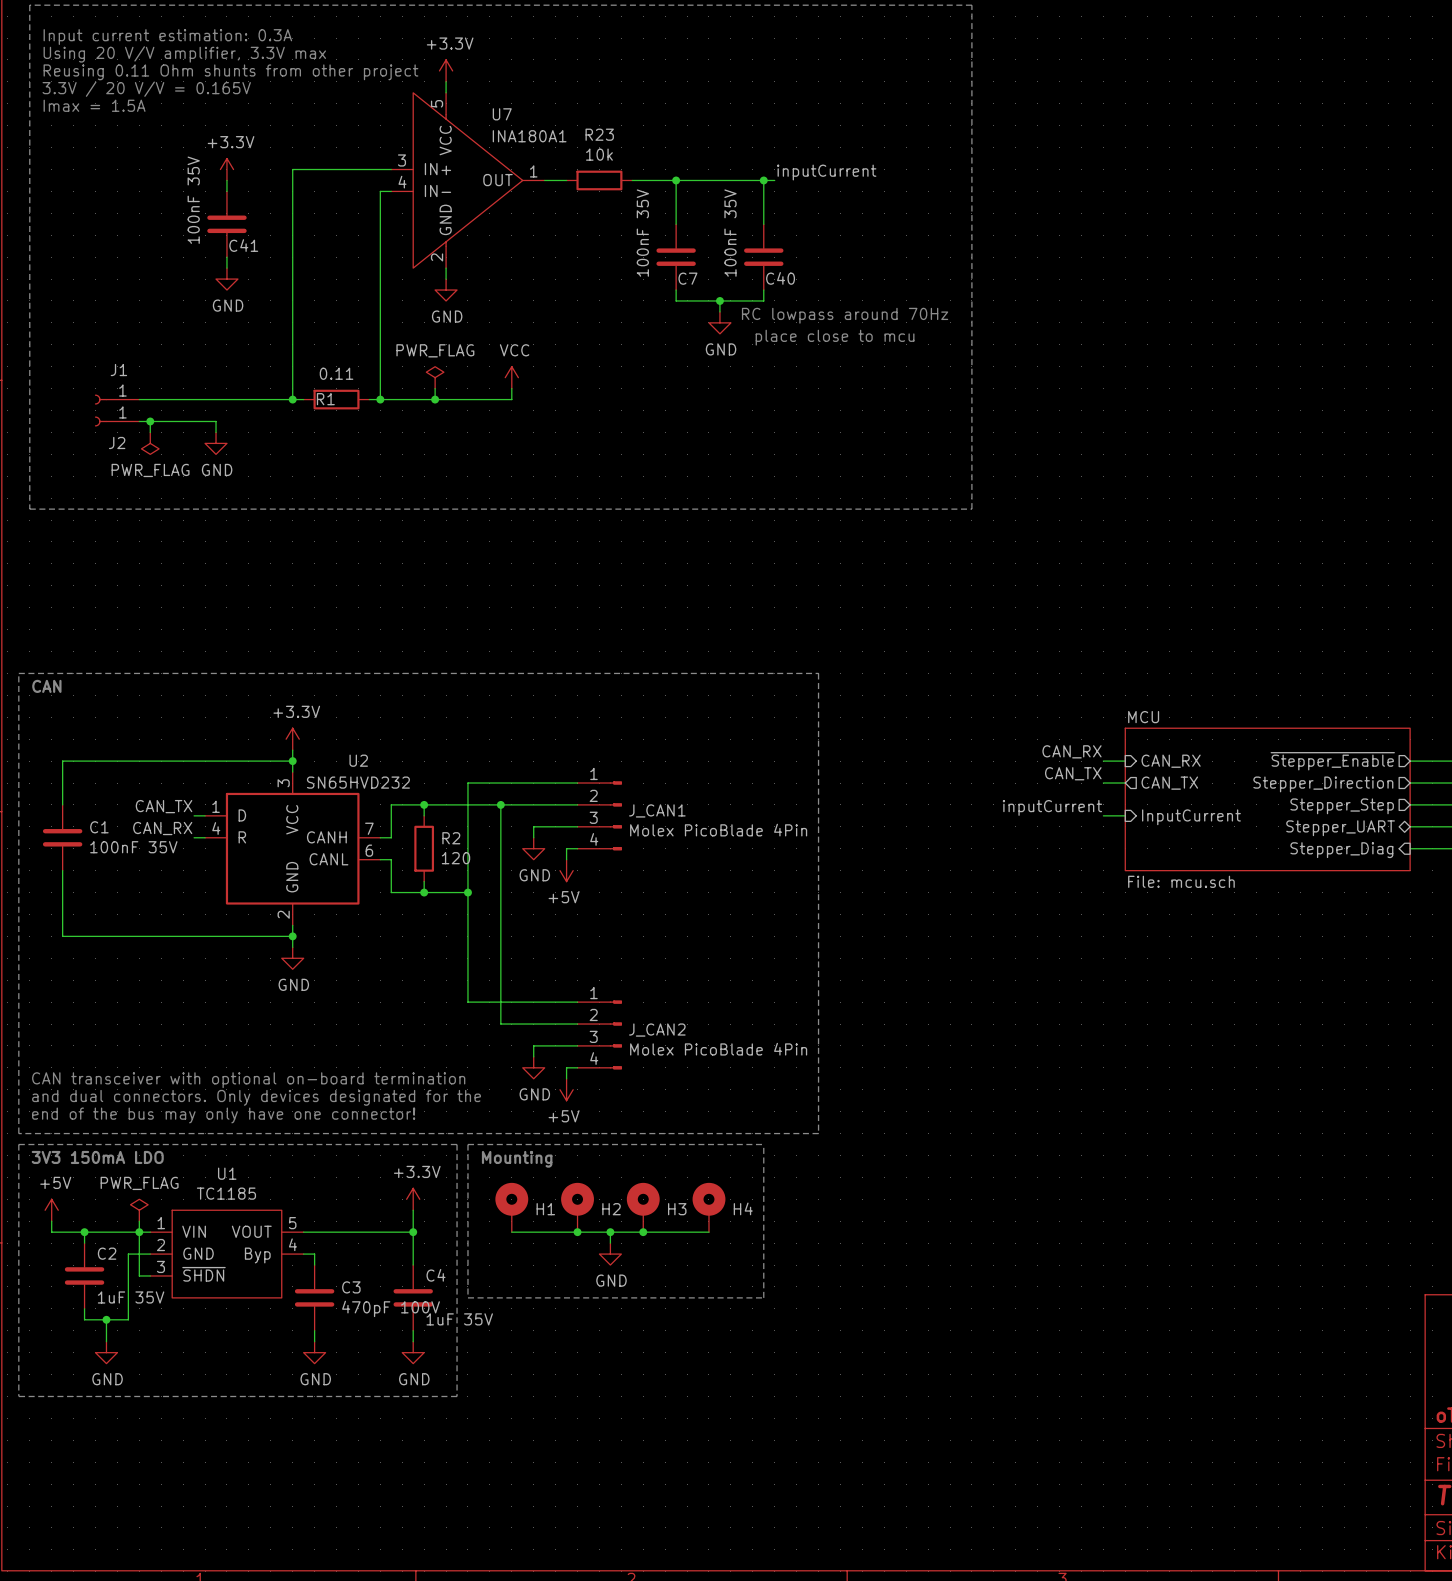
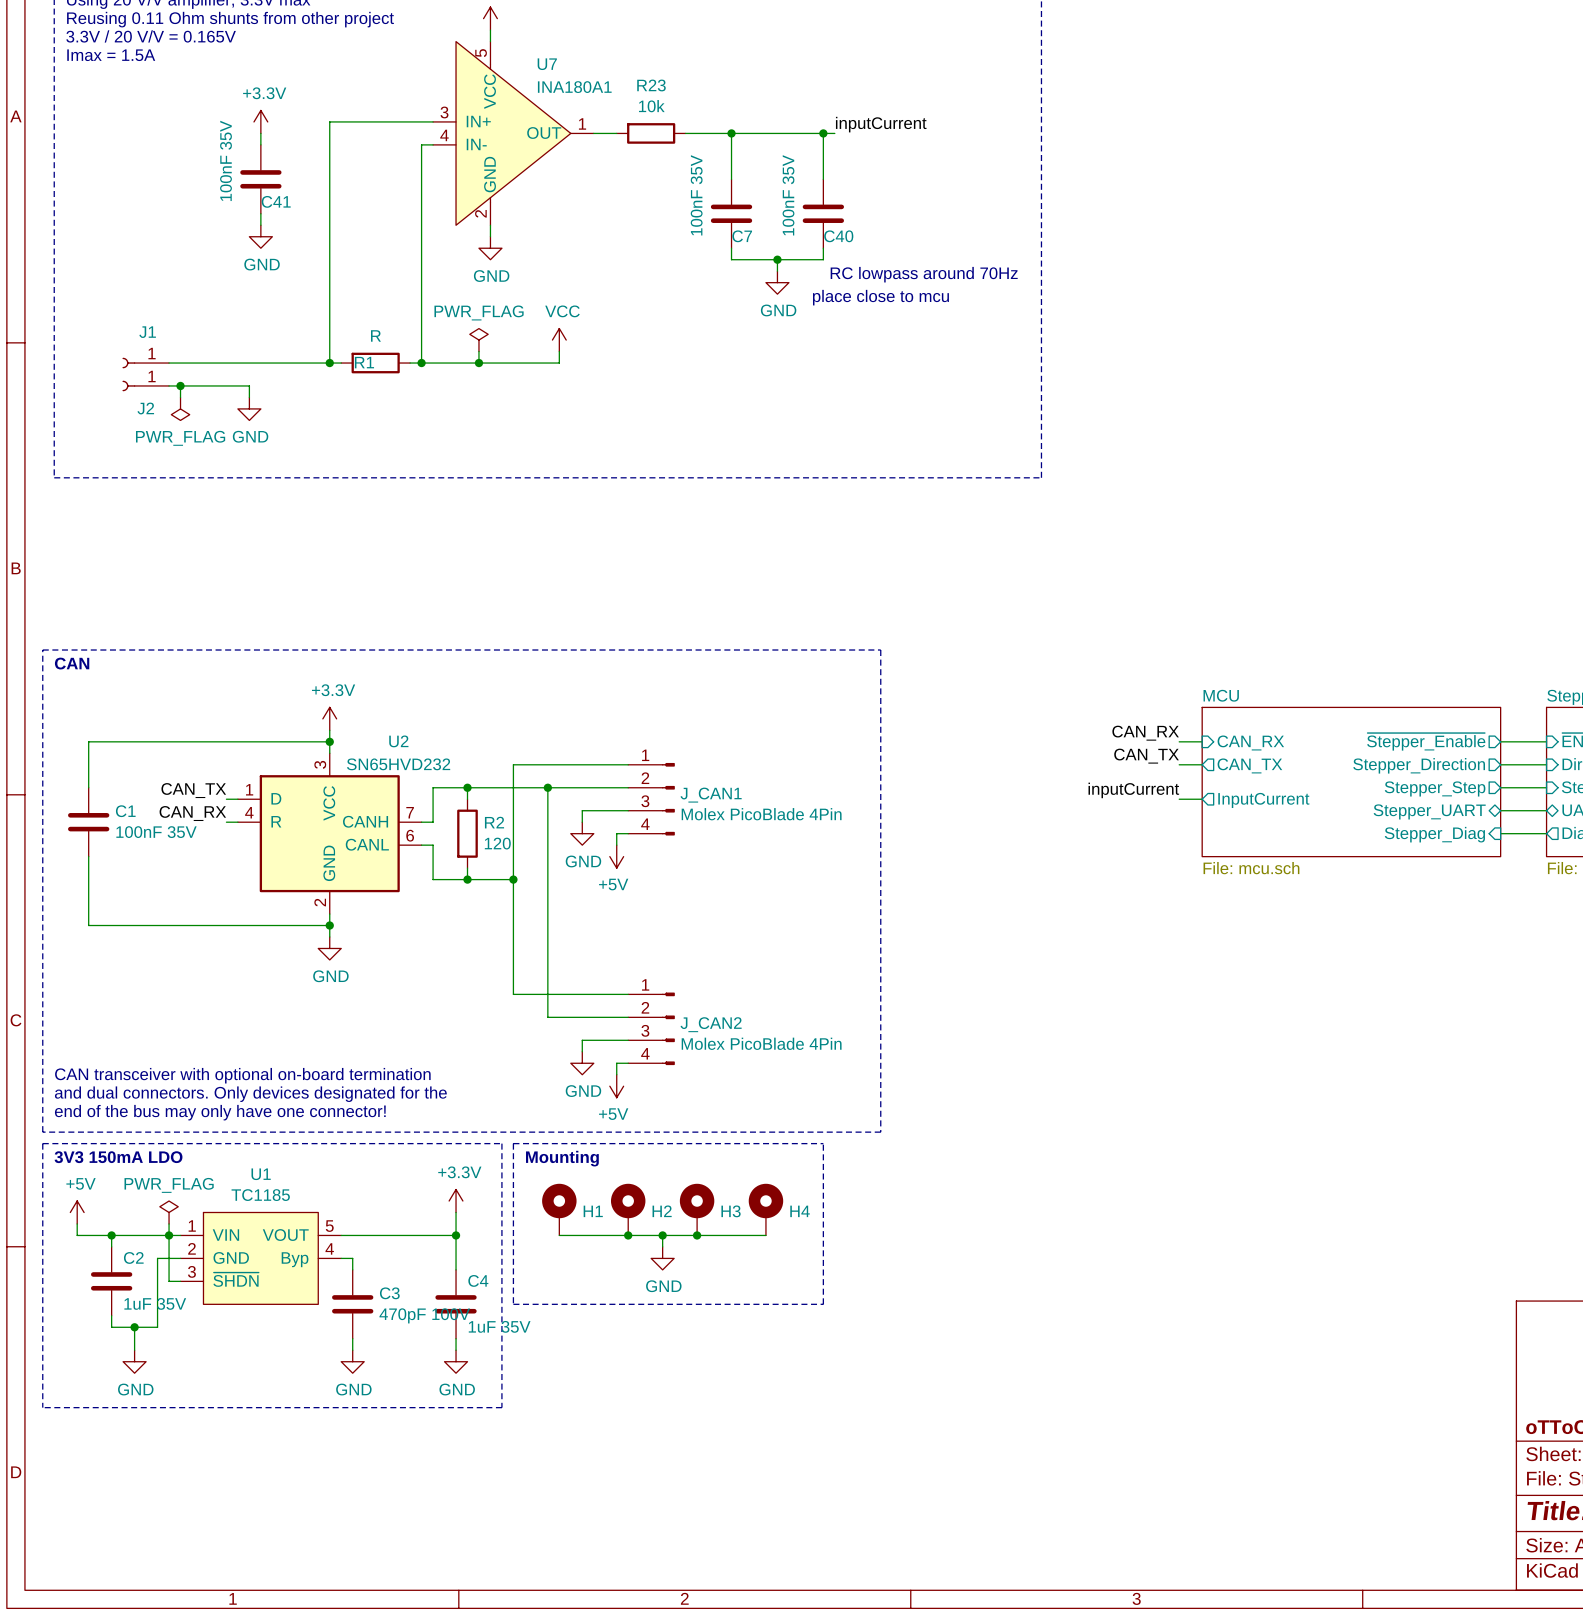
R1 value: 0.11 (336, 373) -> R (375, 335)
sheet pin shape: input (1191, 817) -> output (1263, 800)

